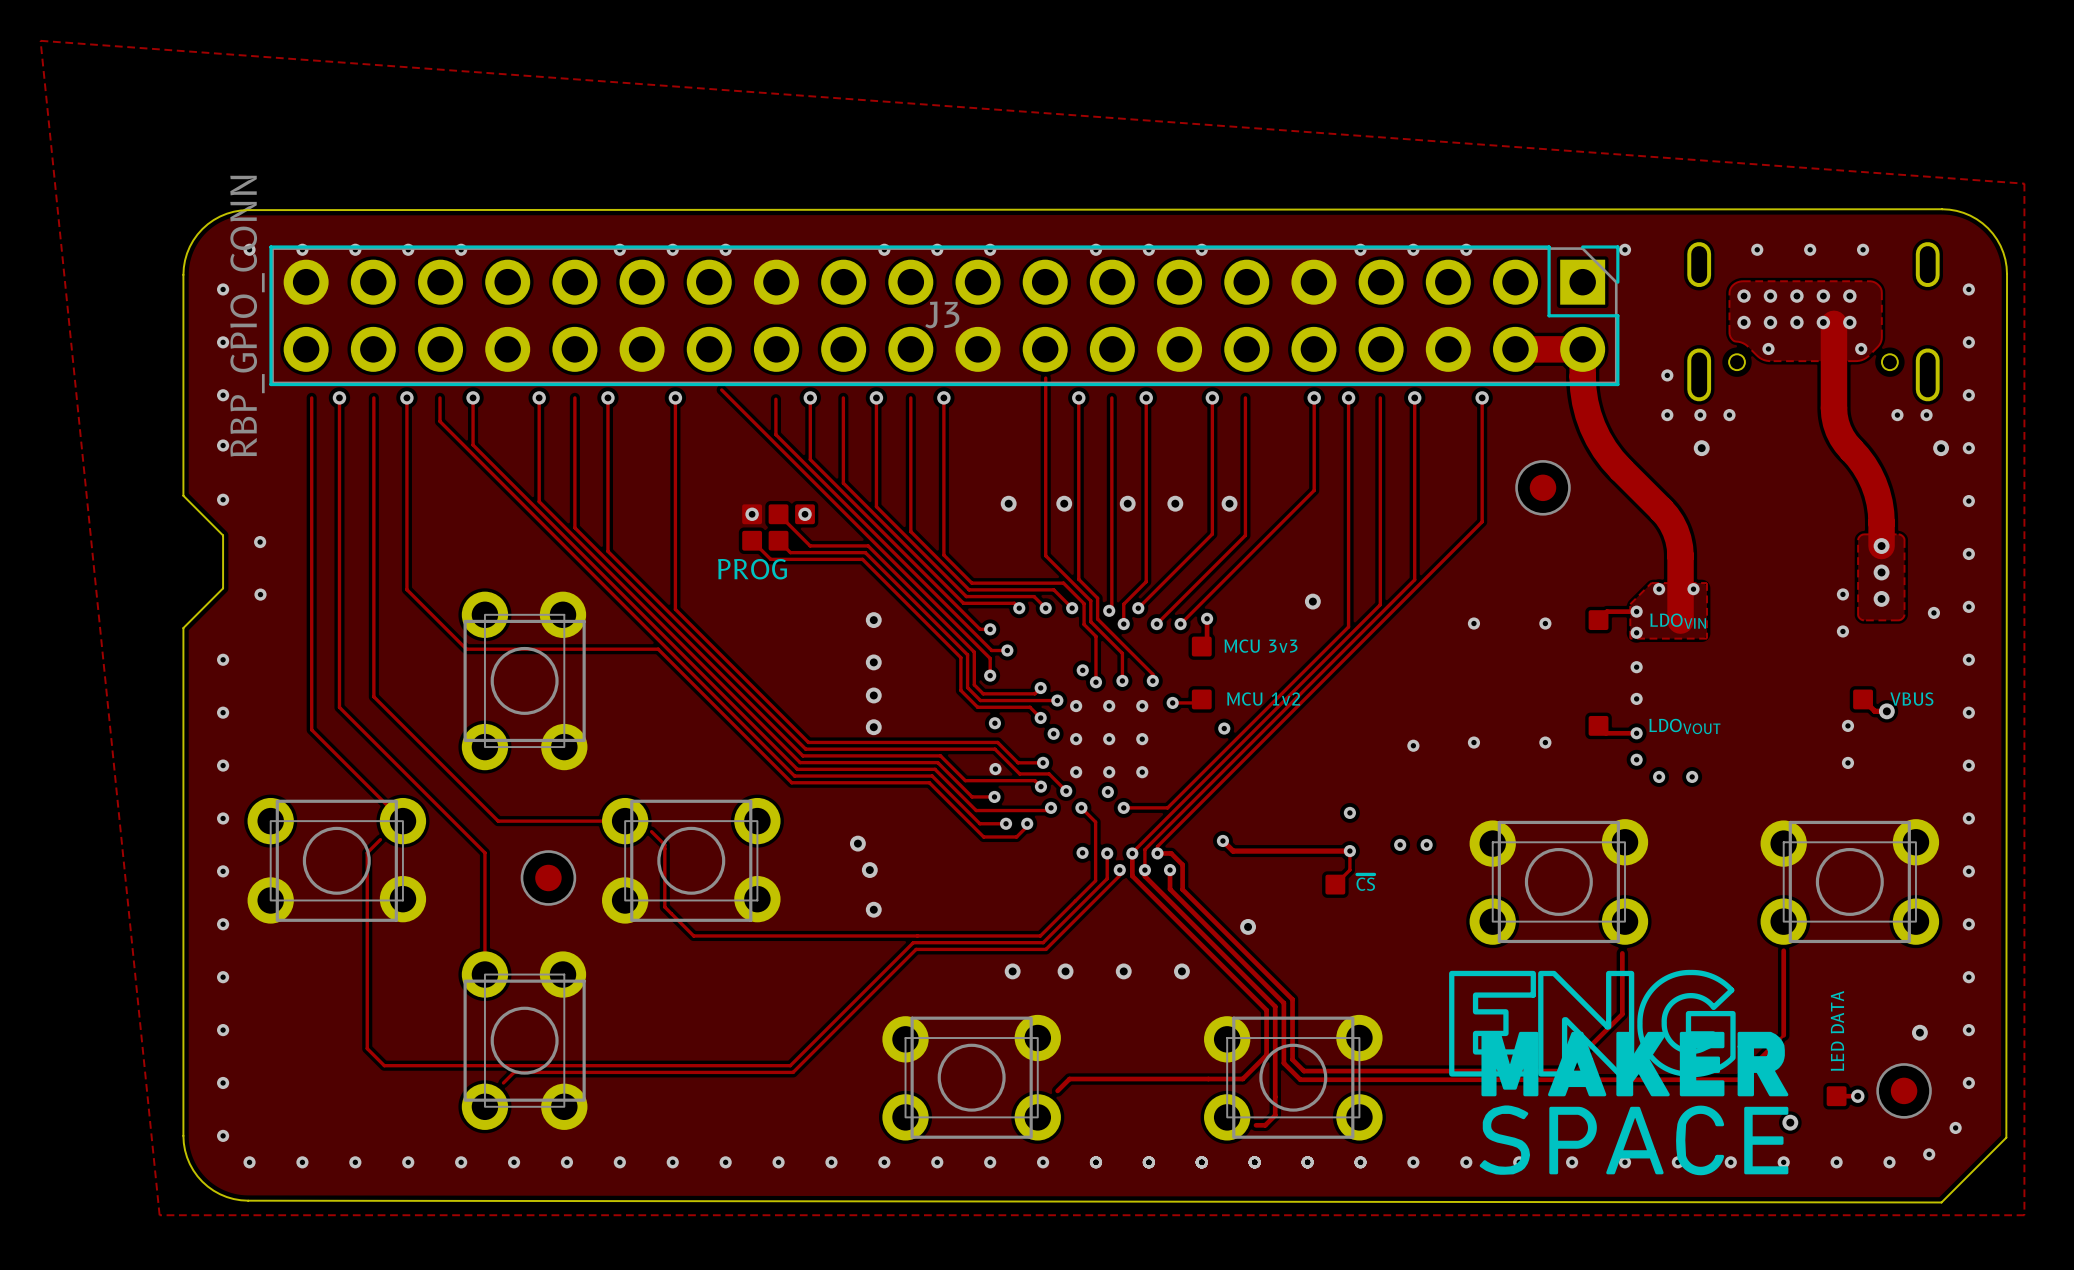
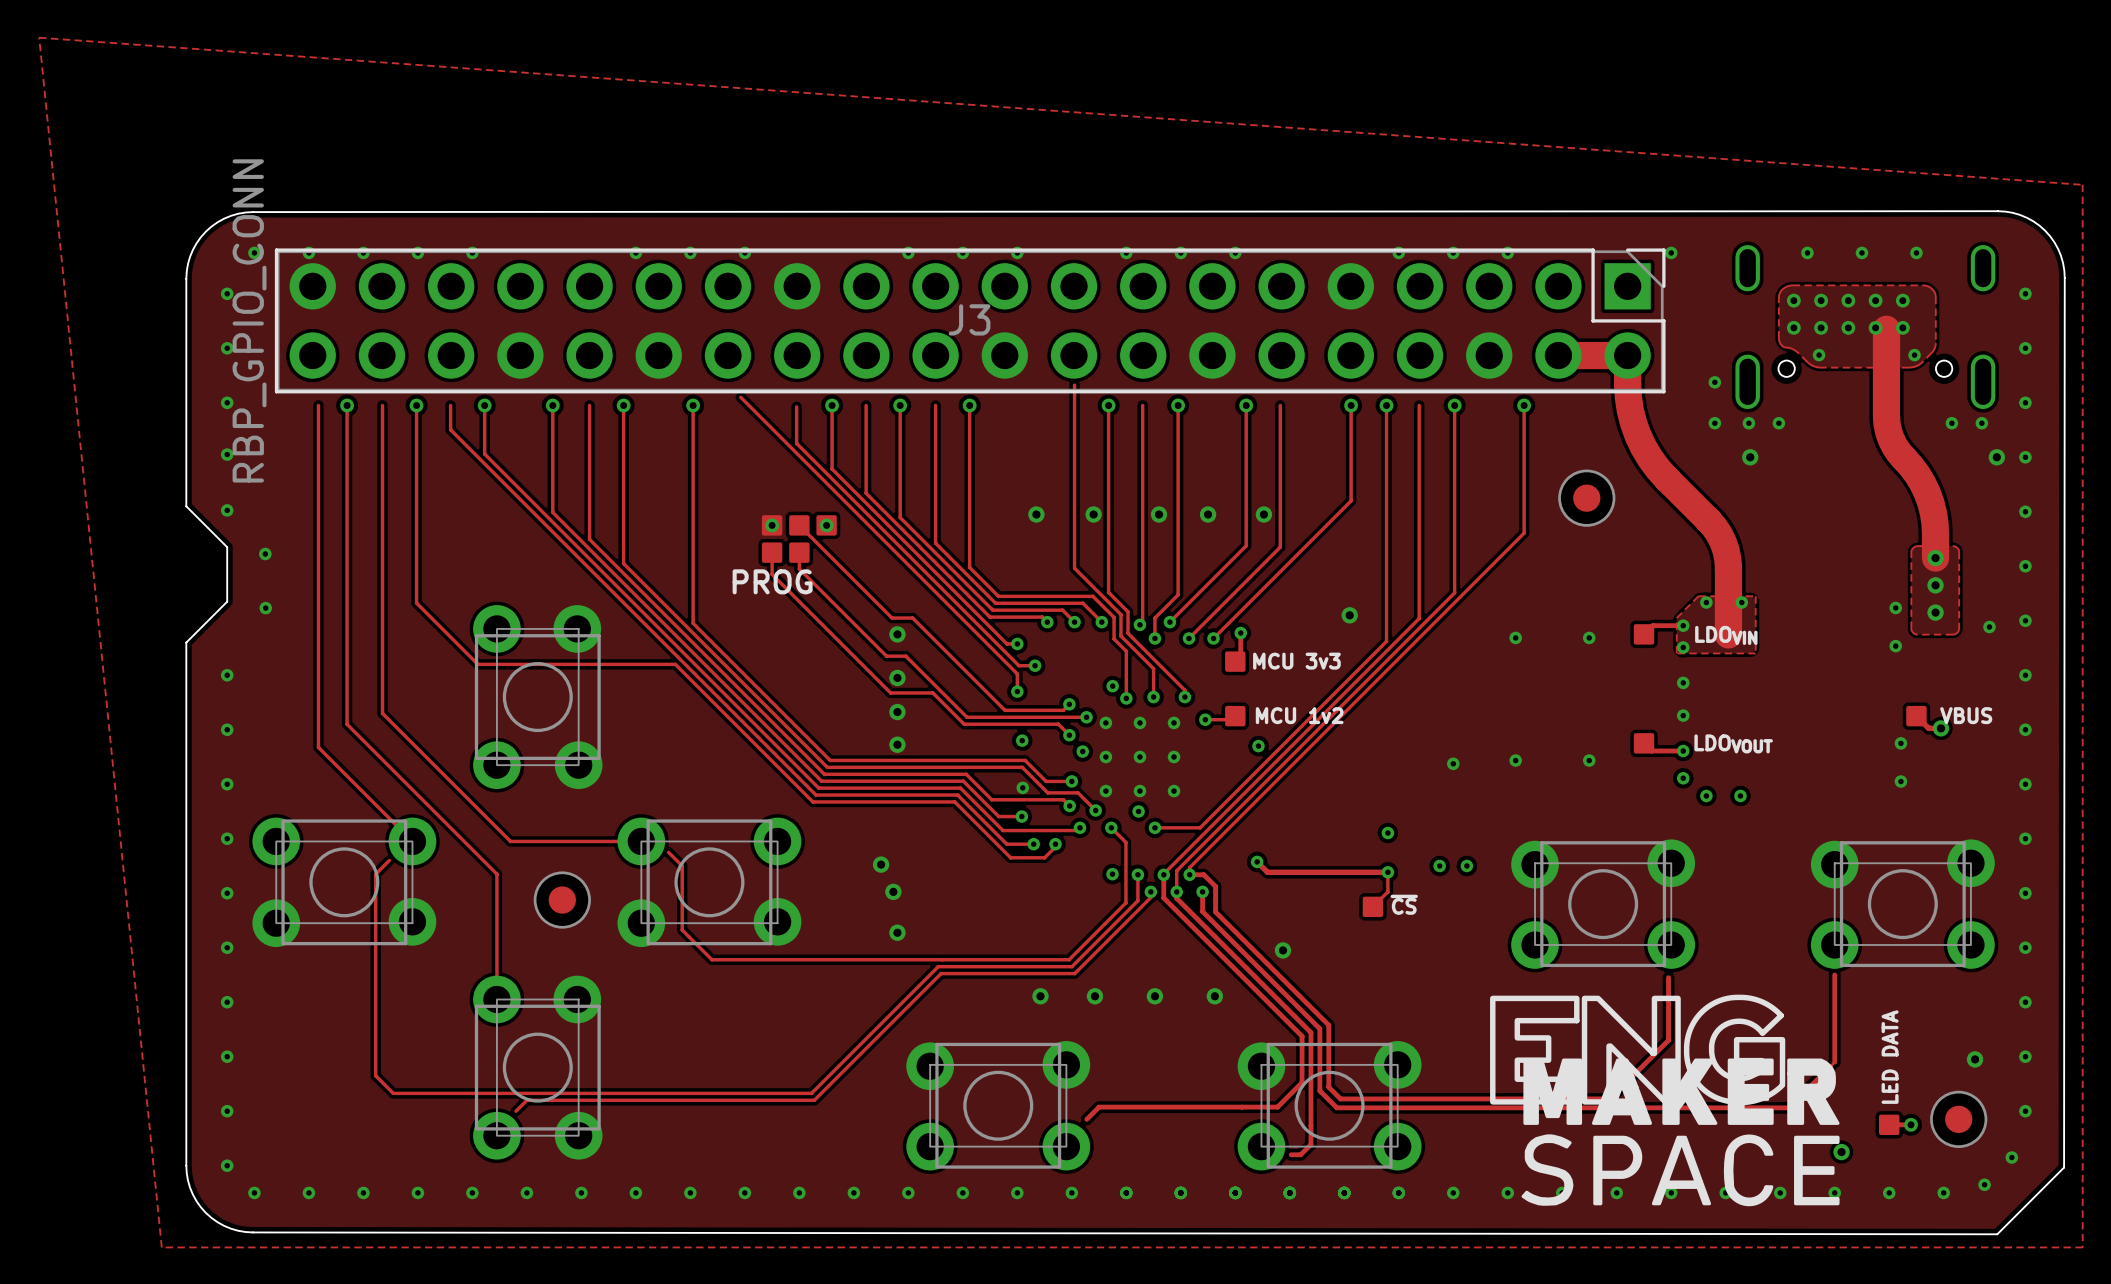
track: (752, 540) (770, 559) (862, 559) (960, 657) (960, 690) (977, 707) -> (772, 552) (772, 574) (890, 692) (932, 692) (964, 724) (1004, 724)
track: (778, 540) (790, 552) (865, 552) (967, 654) (967, 687) (980, 700) -> (799, 552) (799, 569) (886, 656) (905, 656) (966, 717) (1007, 717)
track: (810, 545) (868, 545) (974, 652) (974, 684) (983, 693) -> (831, 557) (892, 618) (912, 618) (1005, 710) (1010, 710)

